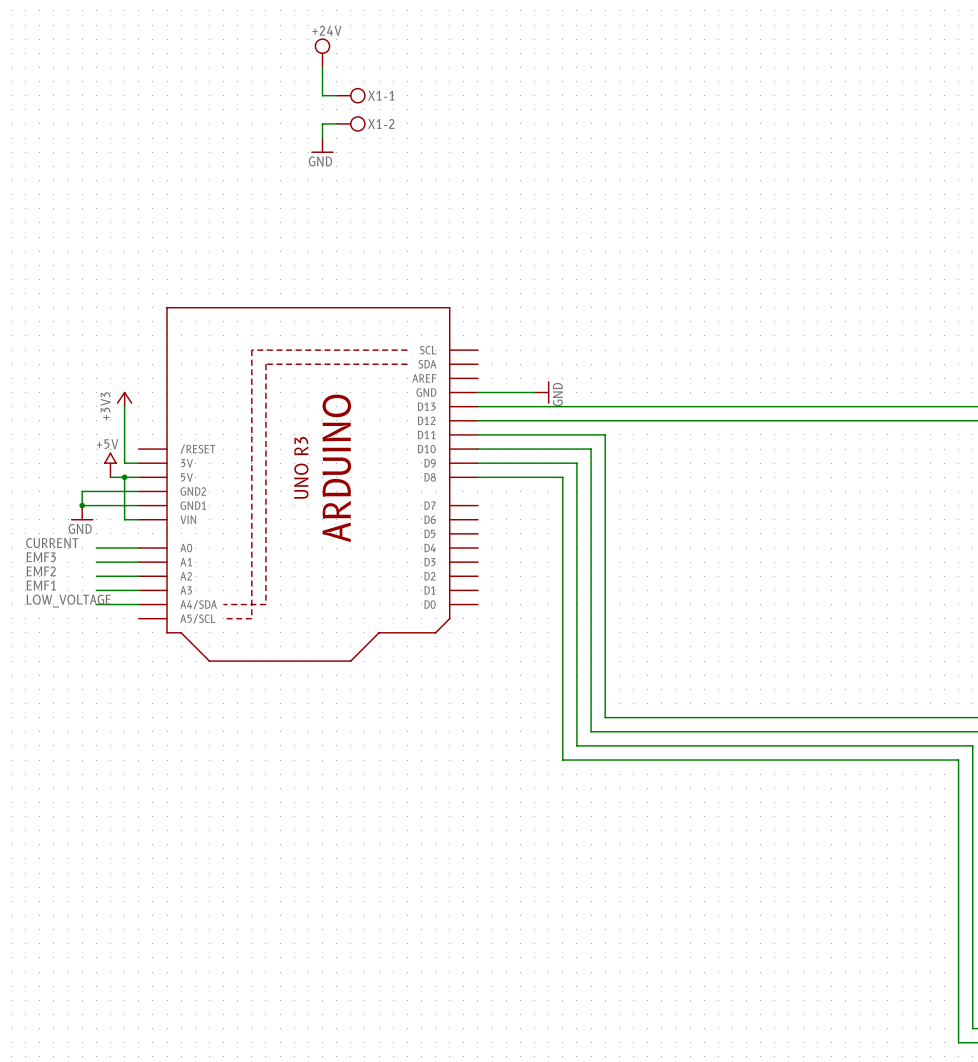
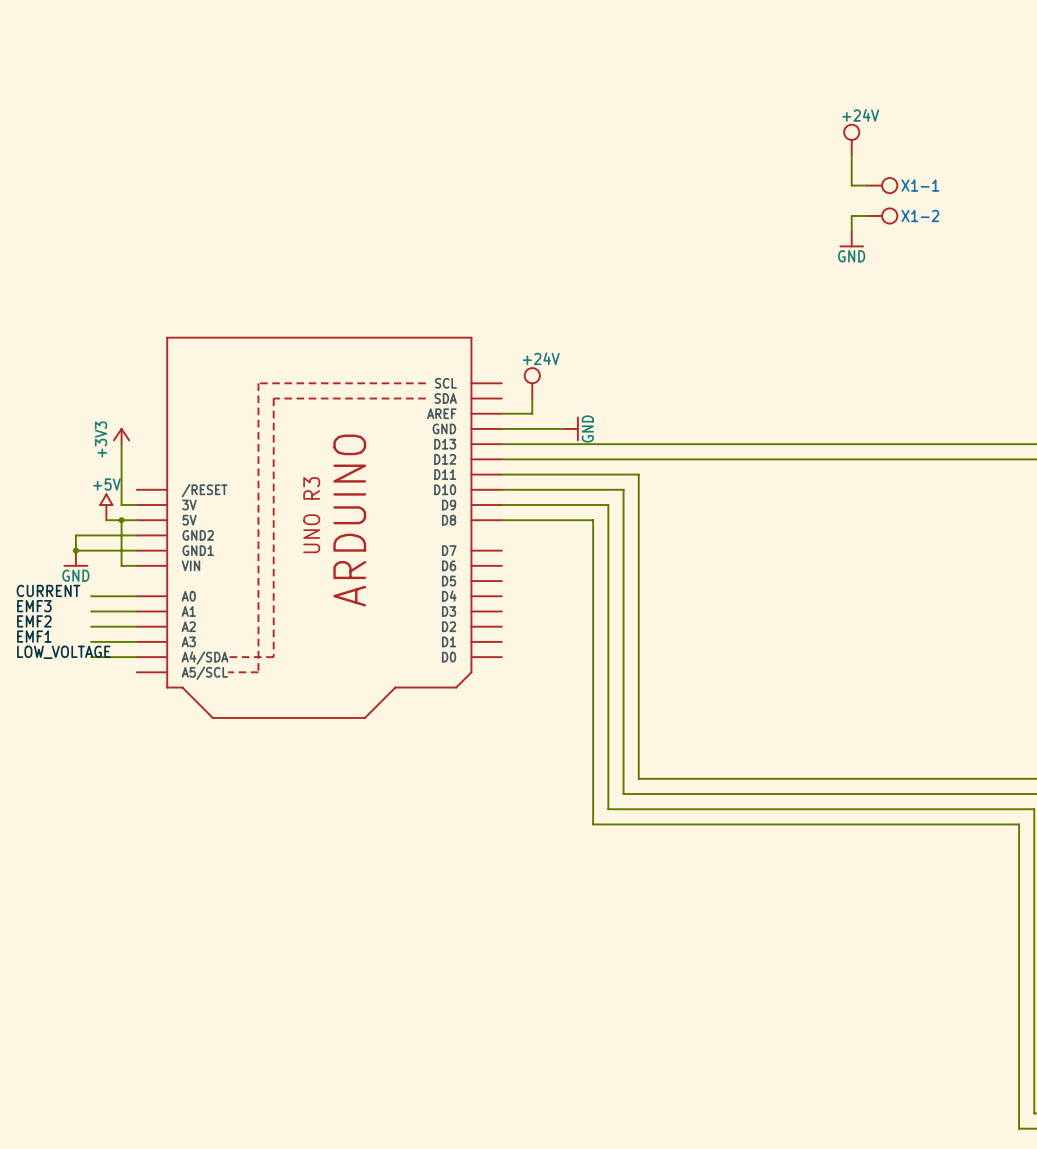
power symbol: +24V (322, 52) -> none
wire: (322, 67) (322, 95) (336, 95) -> none
X1-1 position: (351, 95) -> (882, 185)
wire: (336, 123) (322, 123) (322, 138) -> none
X1-2 position: (351, 123) -> (882, 215)
power symbol: none -> +24V (851, 139)
wire: none -> (851, 155) (851, 185) (866, 185)
power symbol: GND (322, 145) -> none
wire: none -> (866, 215) (851, 215) (851, 231)
power symbol: none -> GND (851, 239)
power symbol: none -> +24V (532, 382)
wire: none -> (532, 398) (532, 413) (501, 413)

